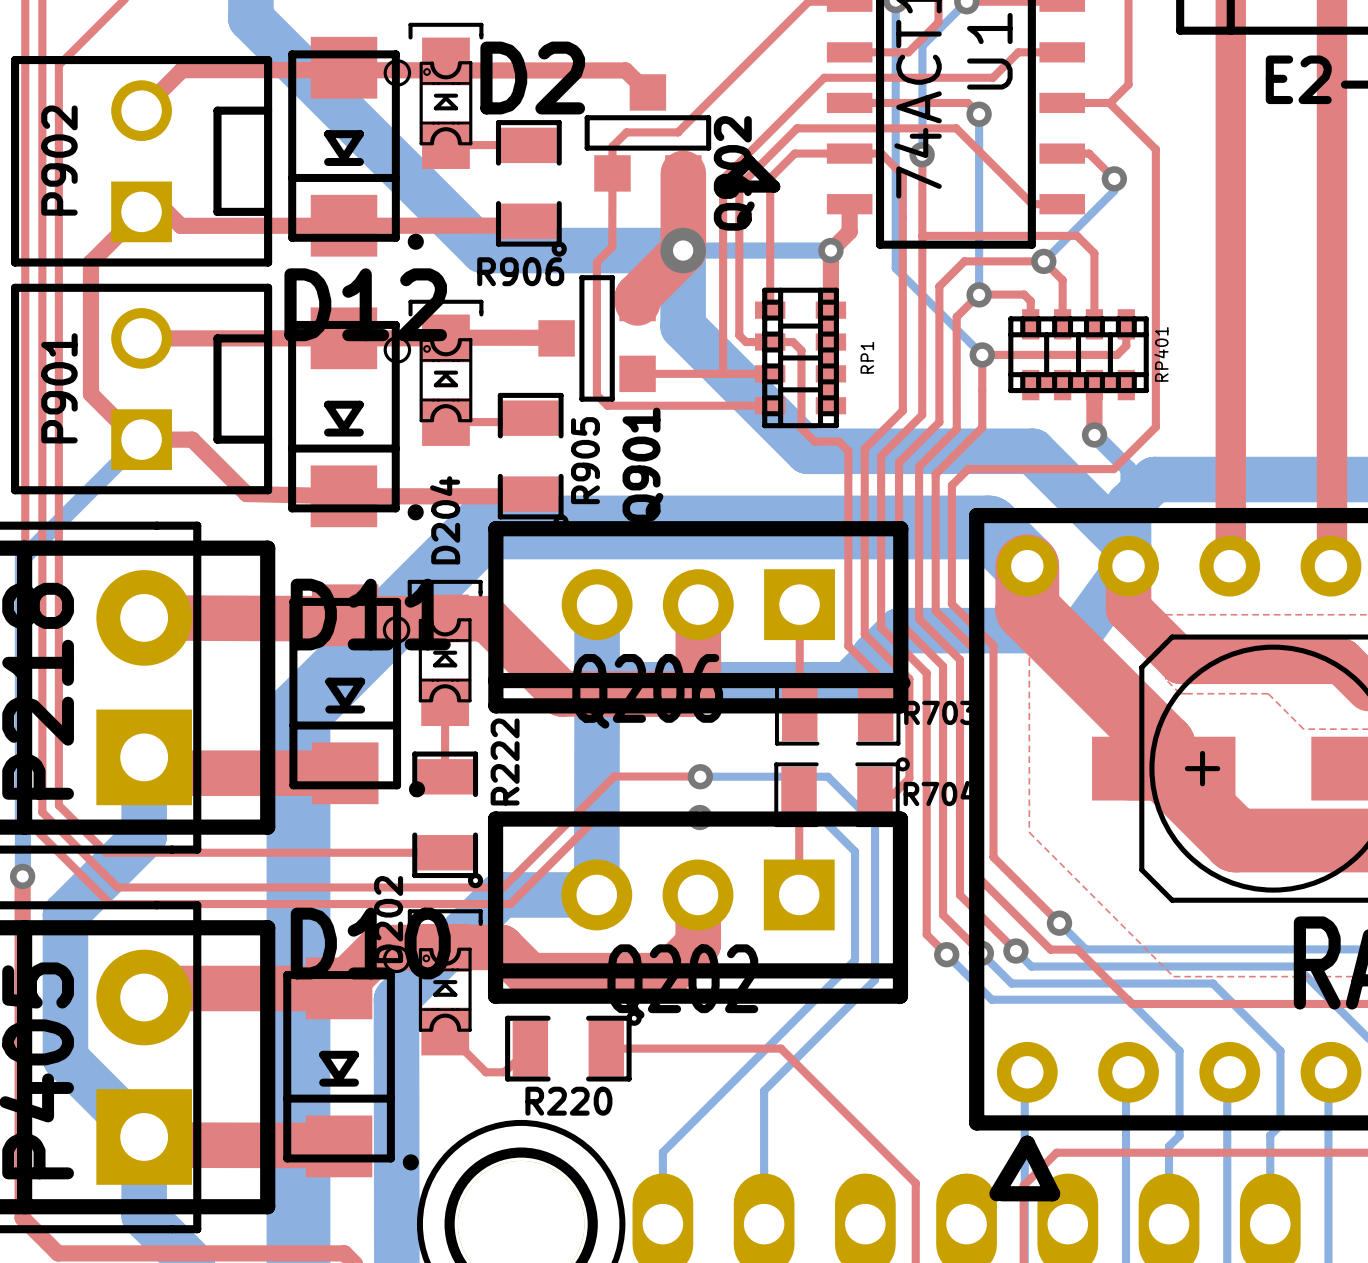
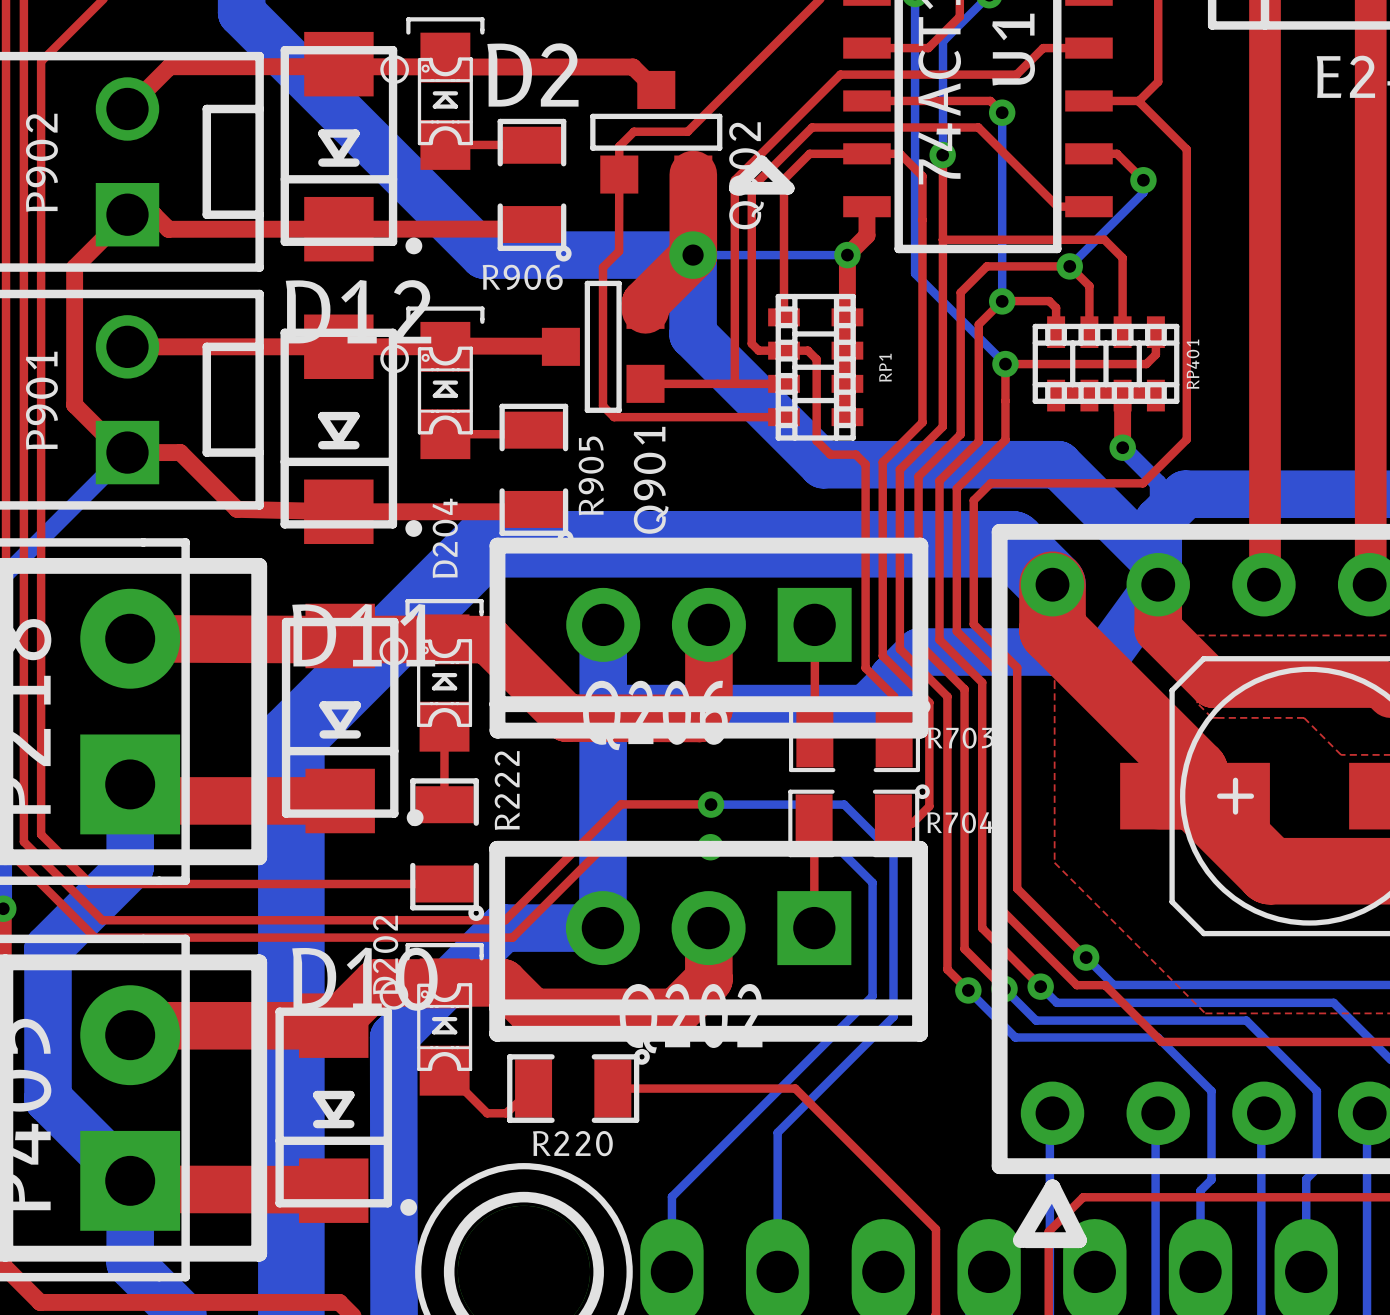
bottom track width: thick (683, 250) (830, 250) -> thin (693, 255) (847, 255)

